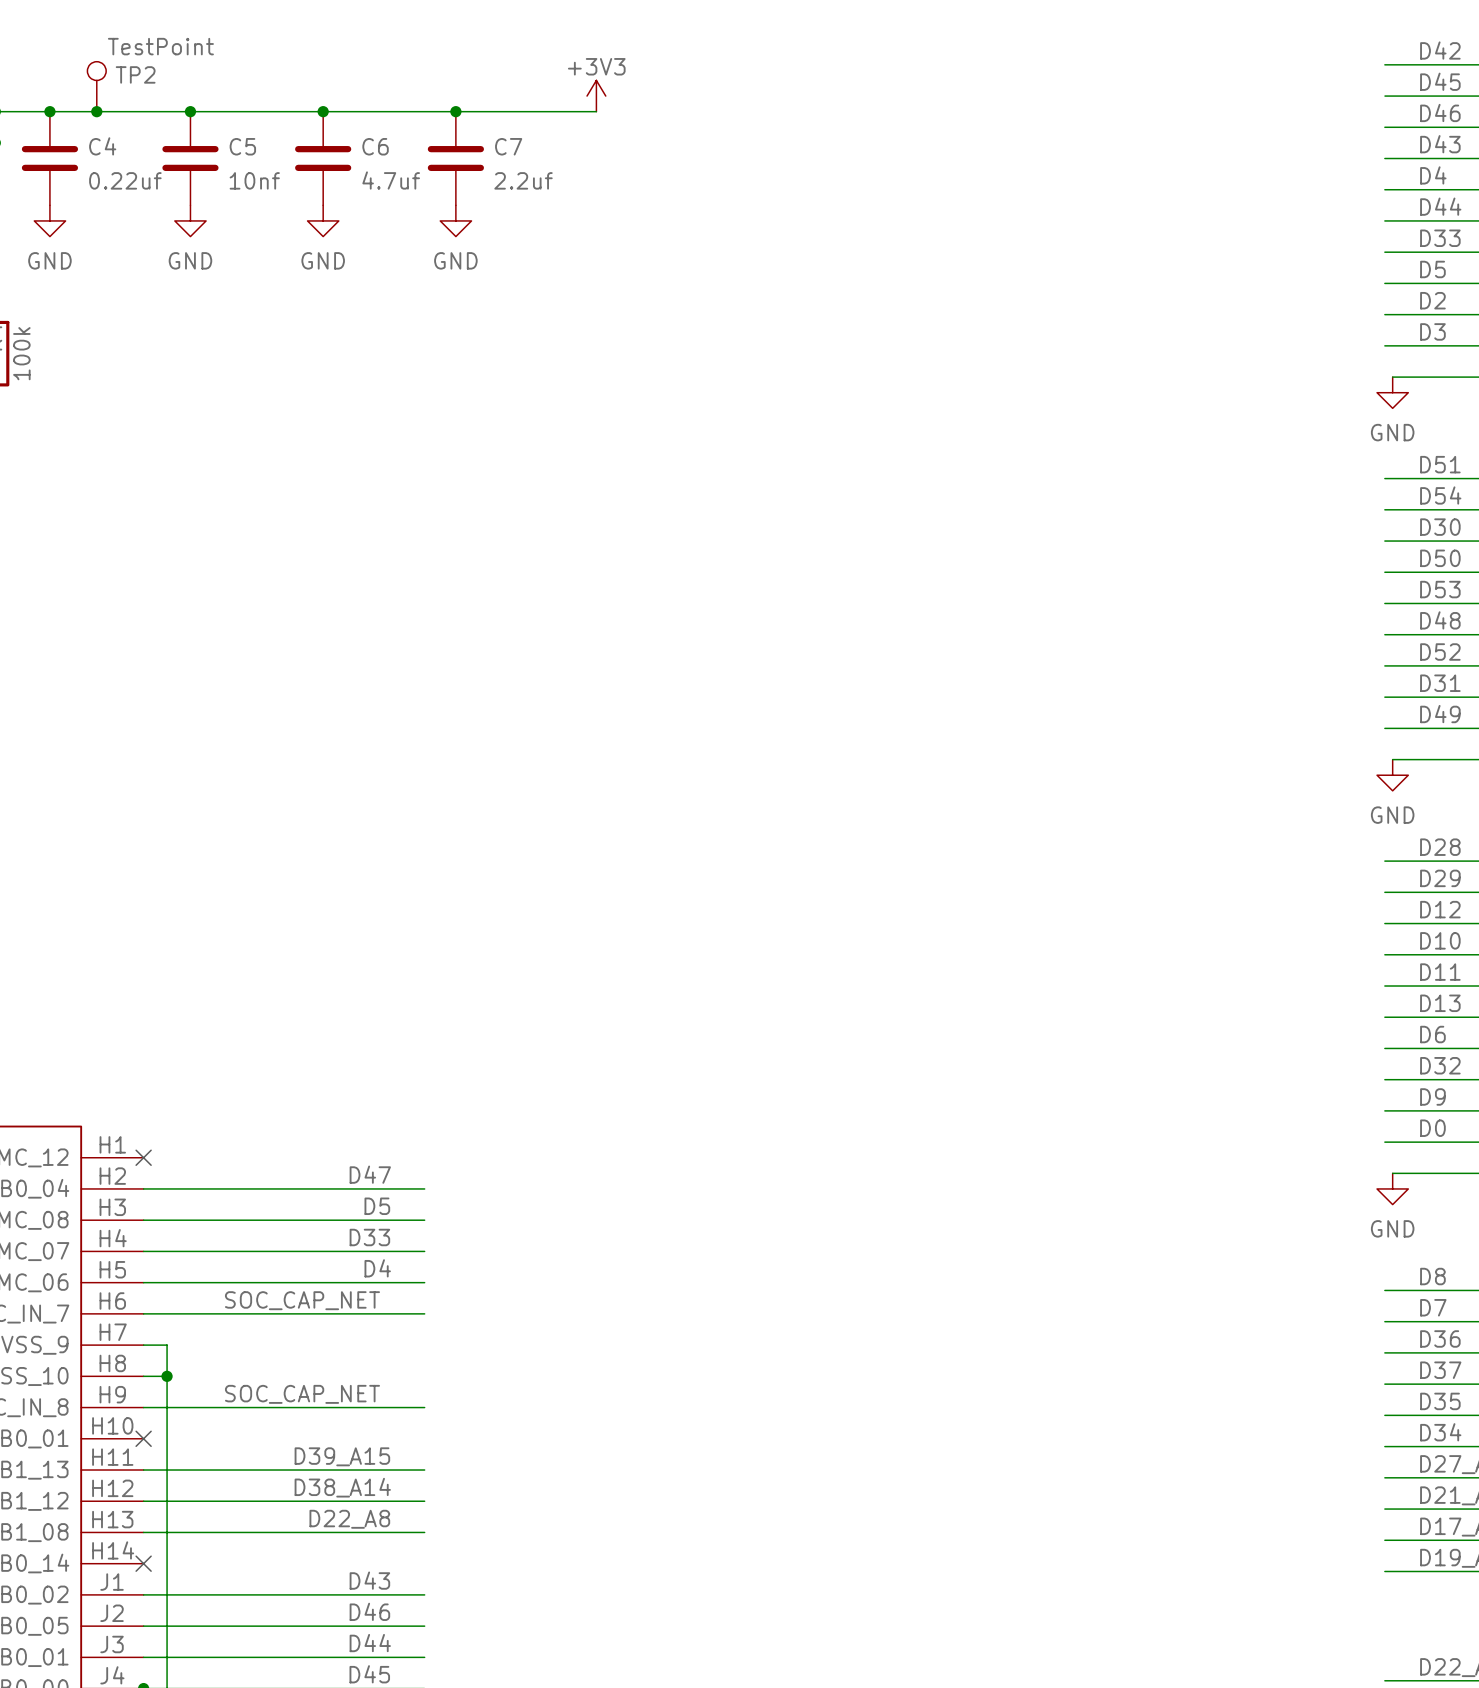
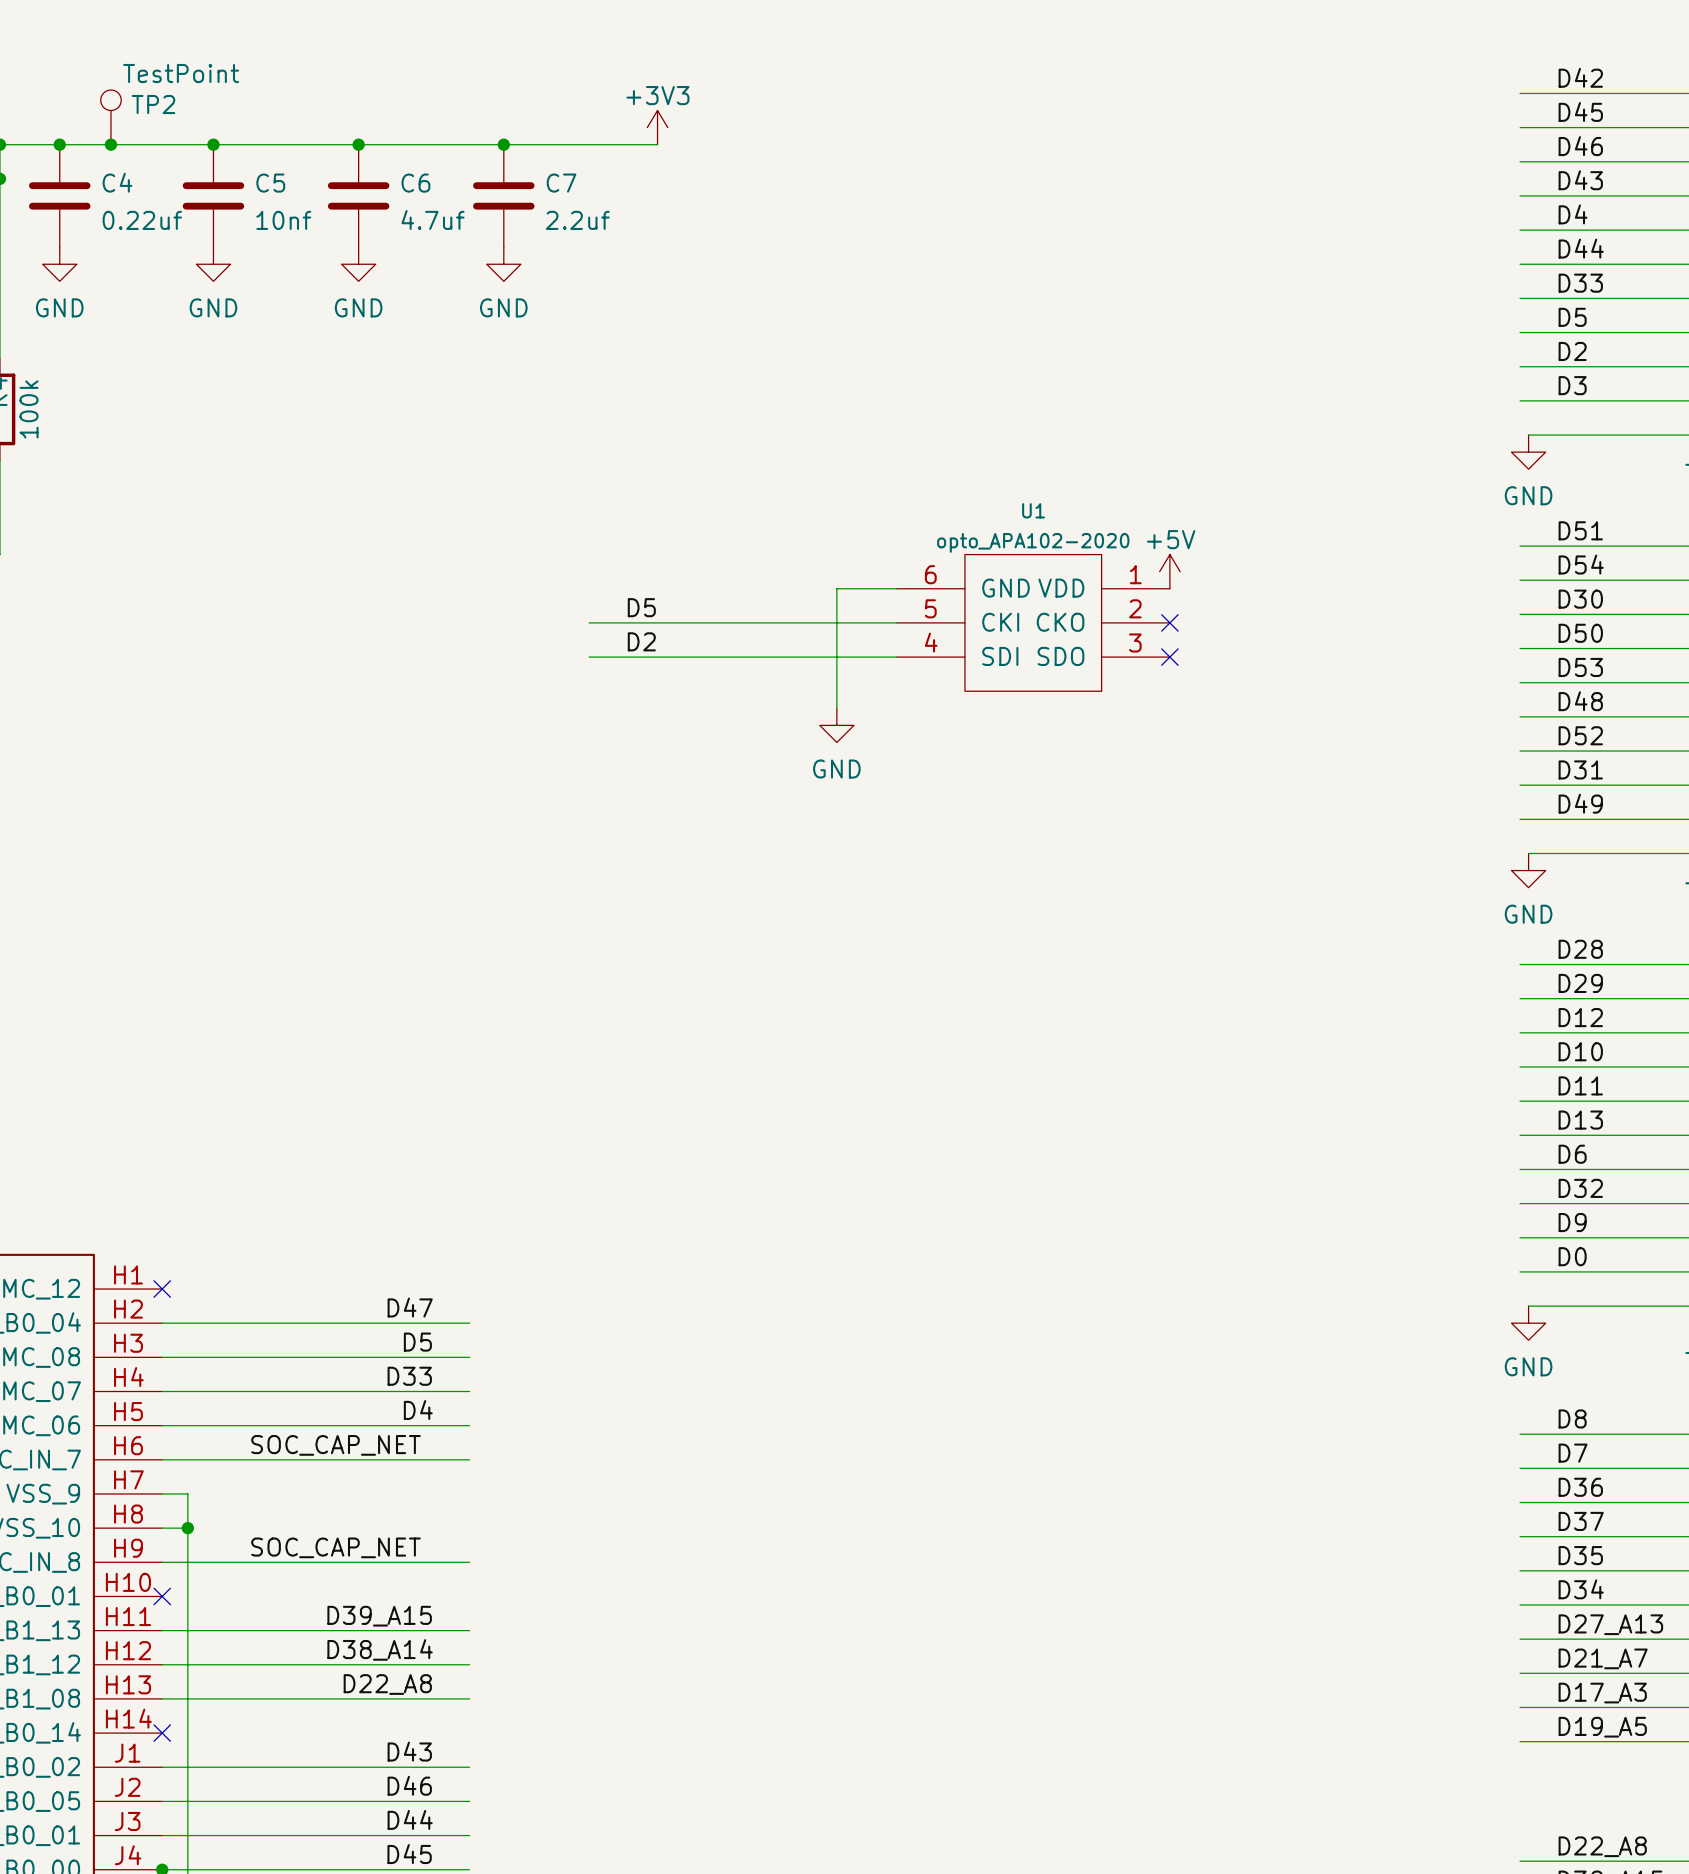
power symbol: none -> +5V (1169, 571)
wire: none -> (896, 588) (836, 588) (836, 708)
label: none -> D5 (641, 607)
wire: none -> (589, 622) (896, 622)
U1: none -> opto_APA102-2020 (1033, 622)
no-connect mark: none -> (1169, 622)
label: none -> D2 (641, 641)
wire: none -> (589, 657) (896, 657)
no-connect mark: none -> (1169, 657)
power symbol: none -> GND (836, 725)

